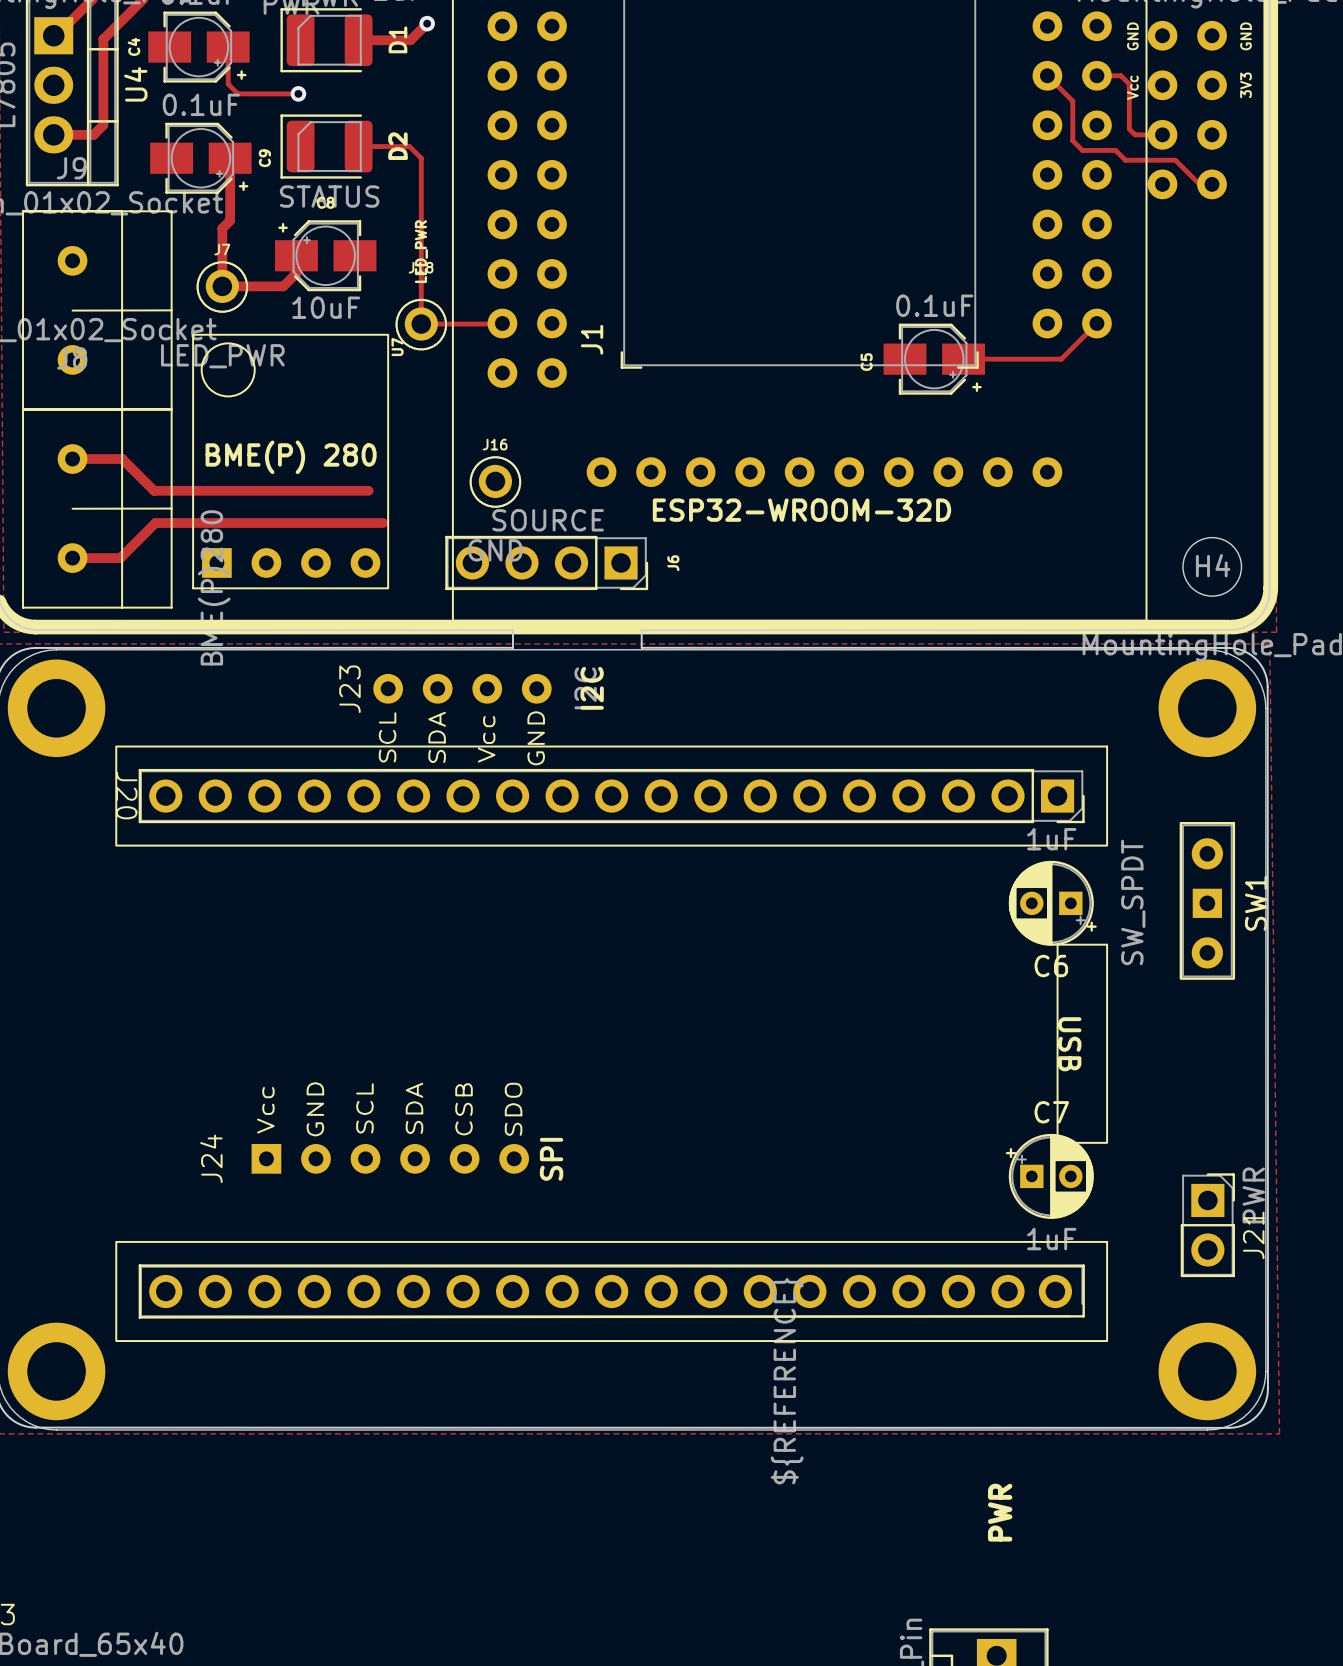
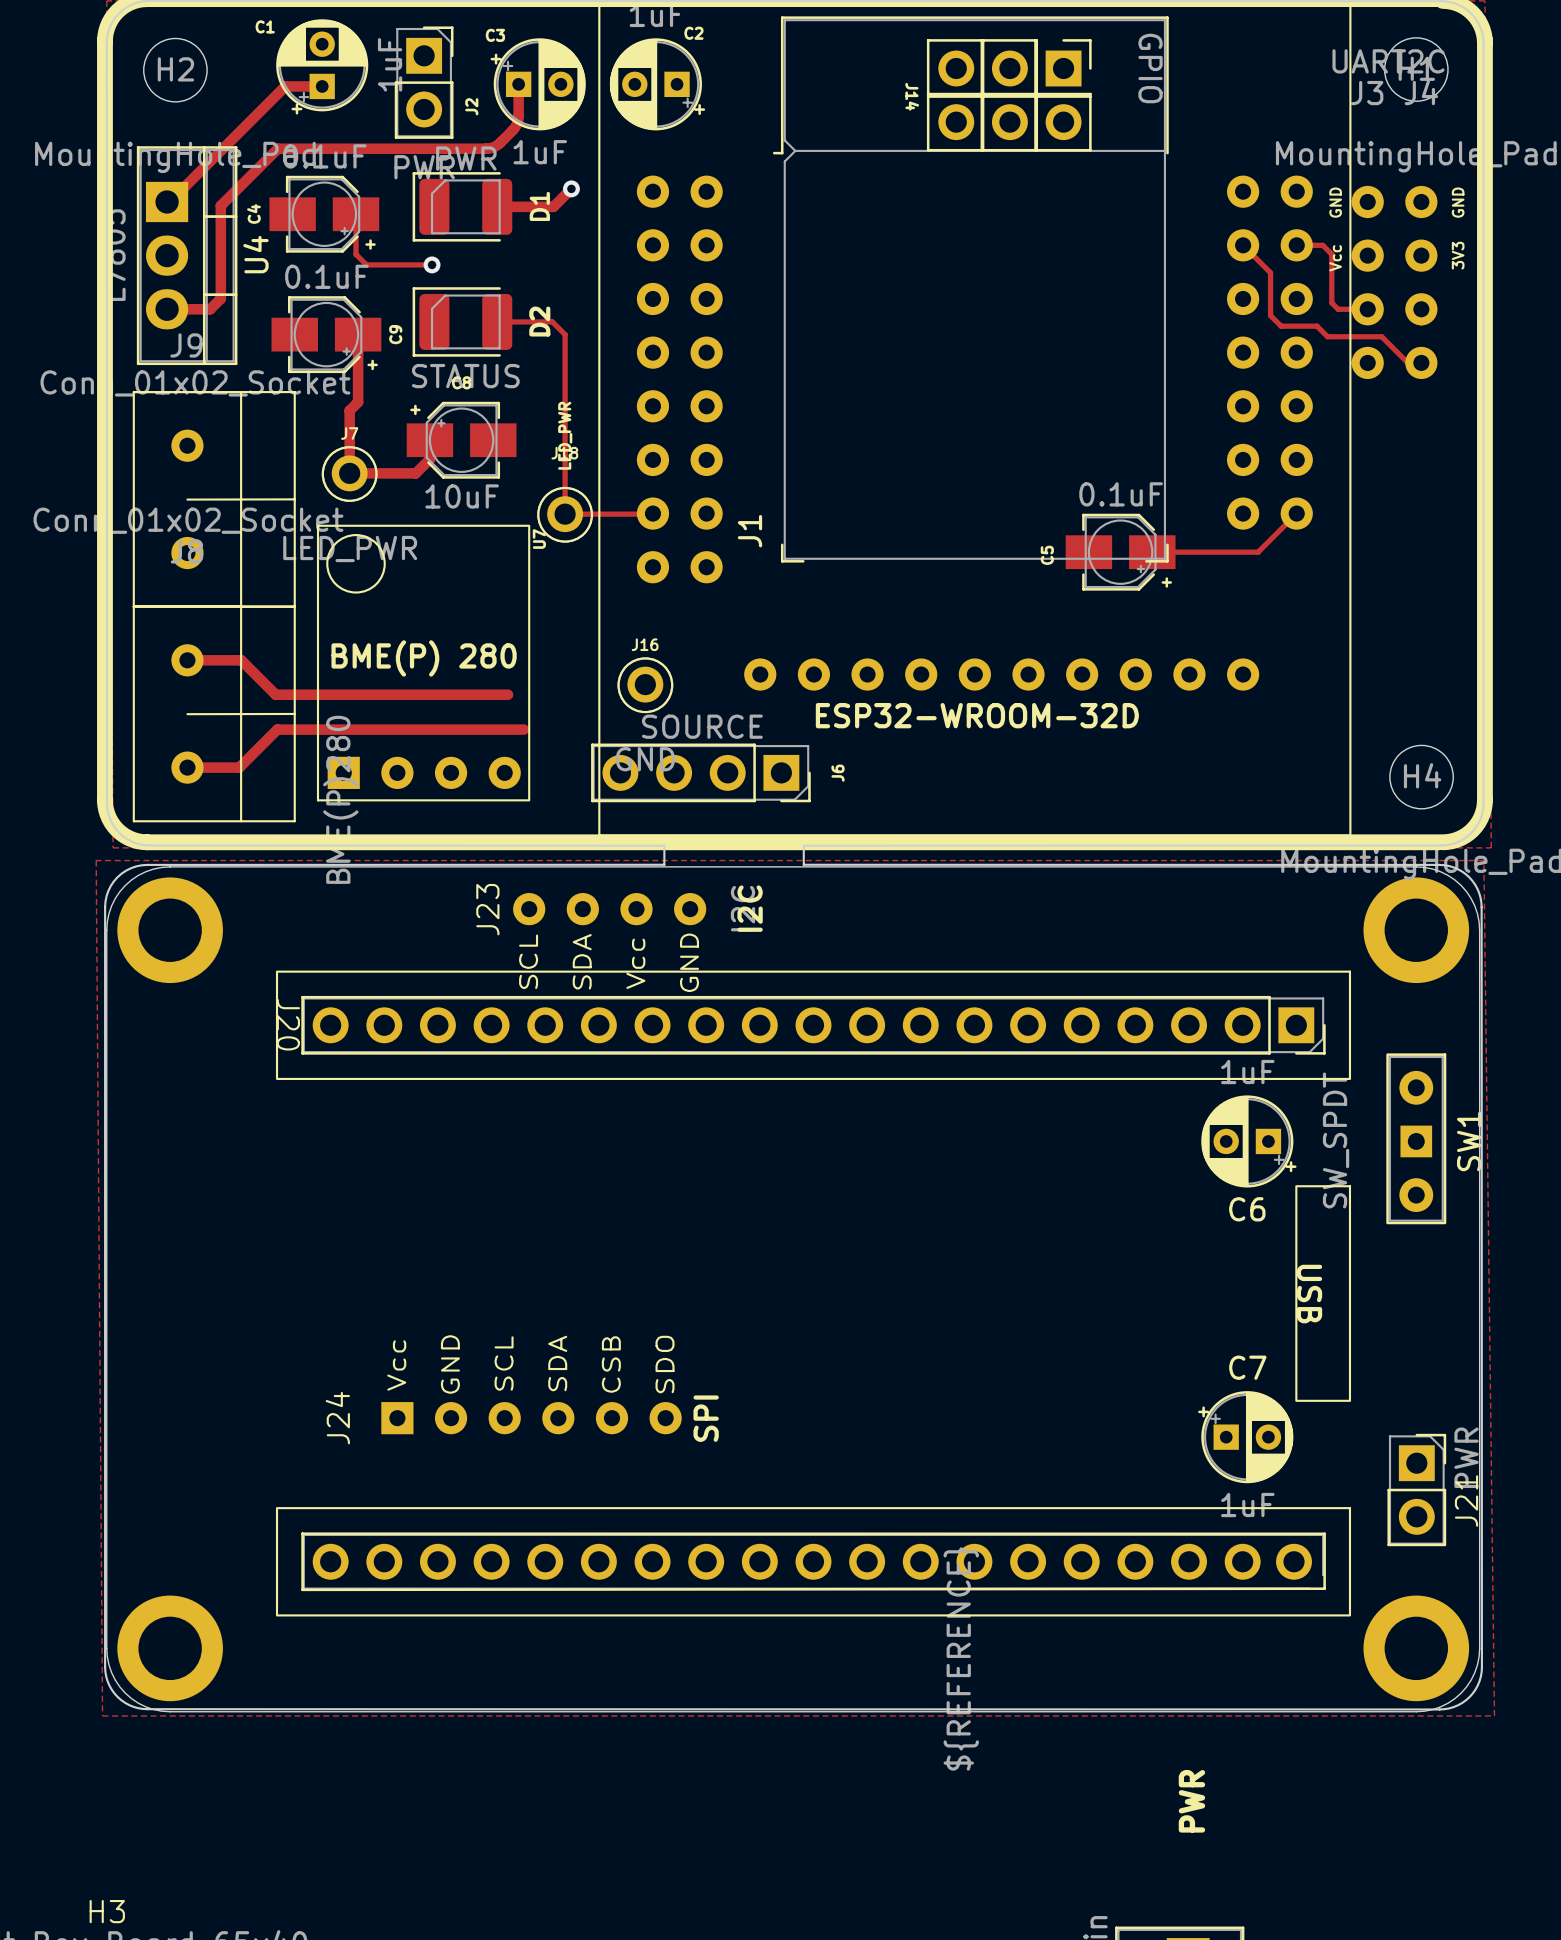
J20 position: (611, 1043) -> (813, 1293)

